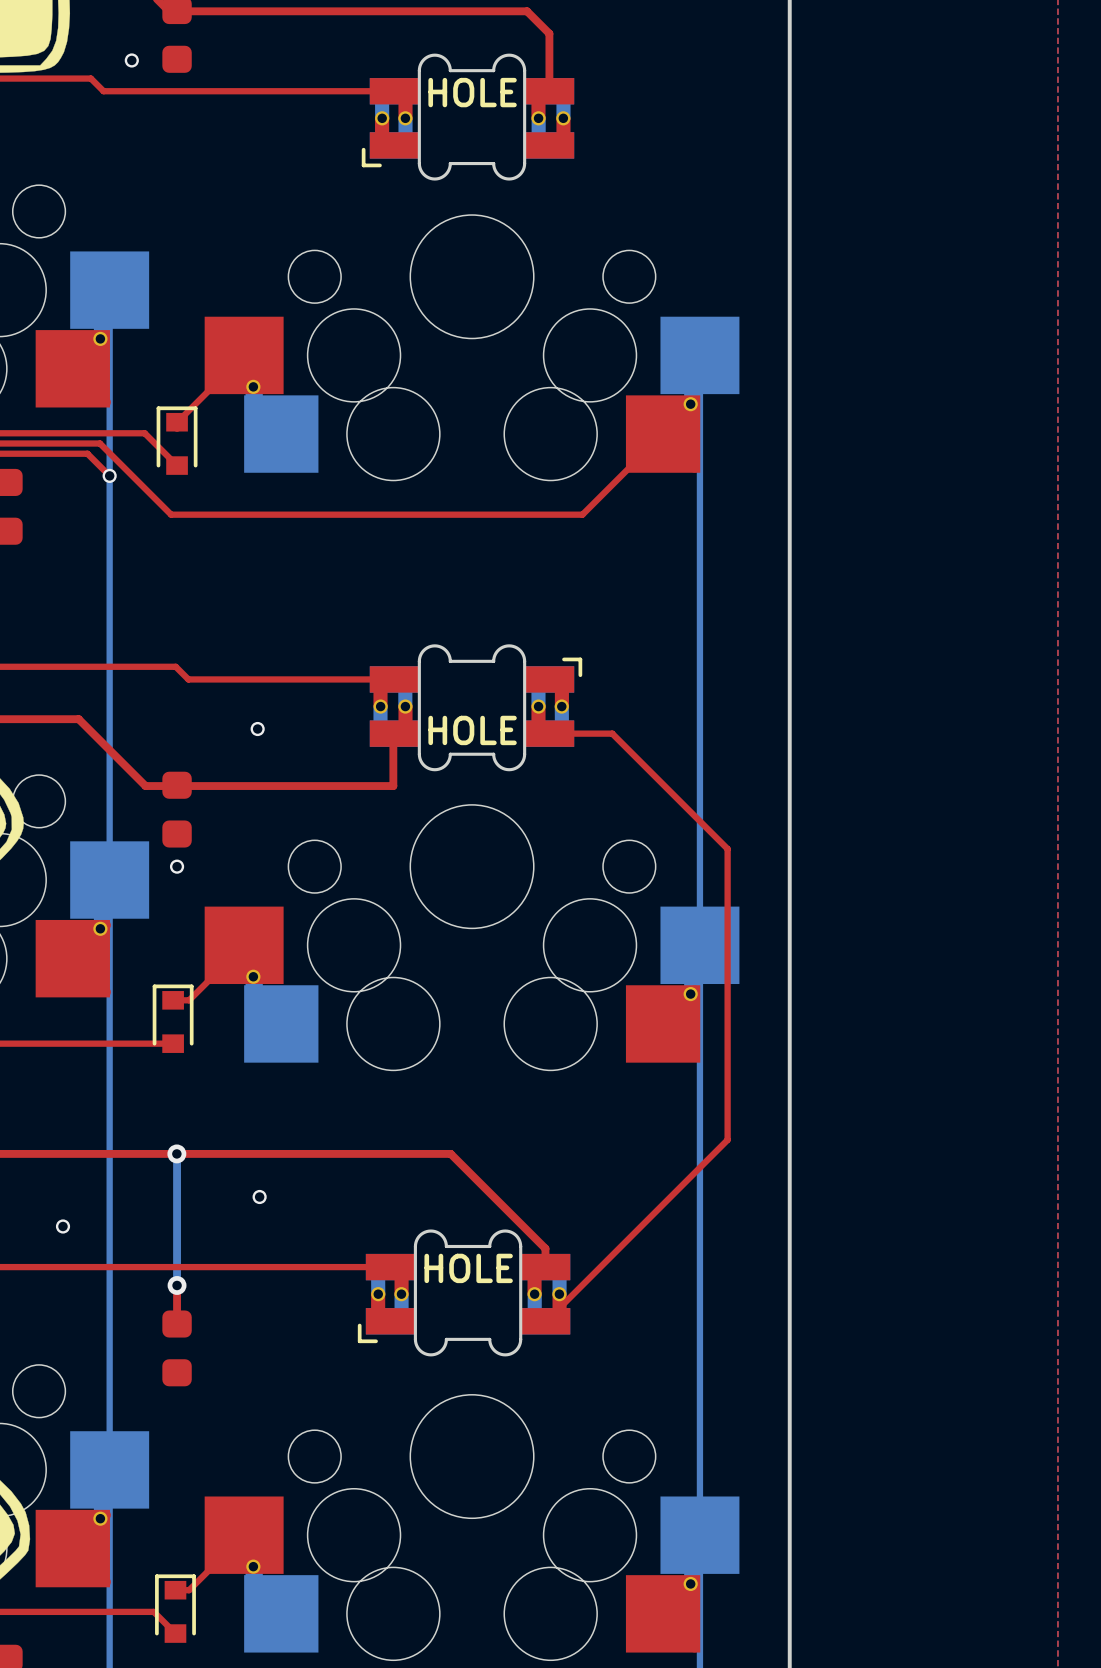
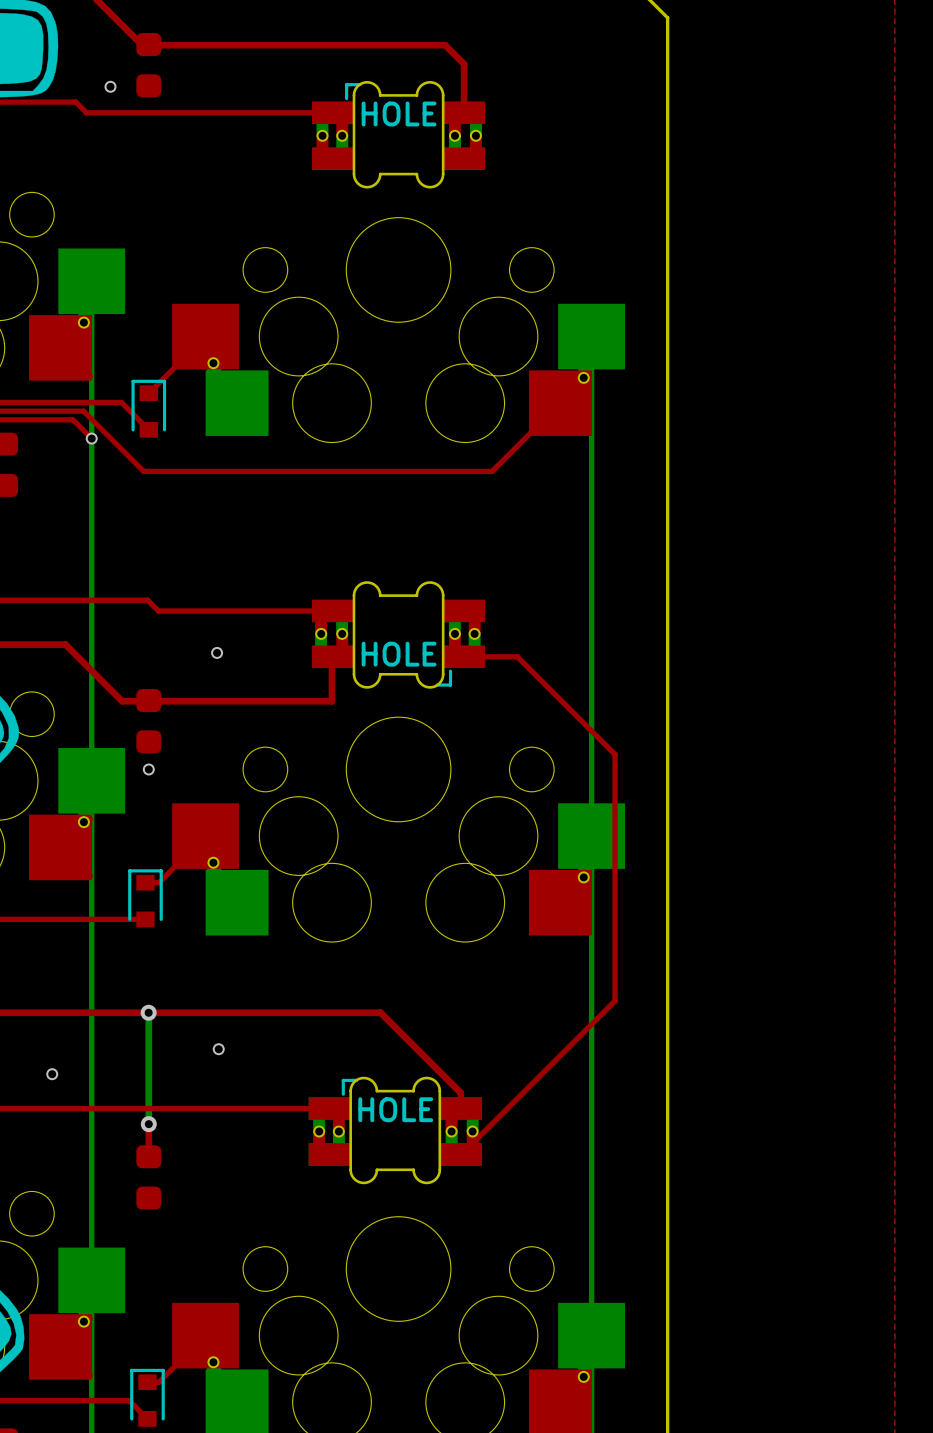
part footprint: [361, 53, 575, 181] -> [312, 80, 486, 189]
part footprint: [369, 644, 583, 772] -> [312, 581, 486, 689]
part footprint: [357, 1229, 571, 1357] -> [308, 1076, 482, 1185]

